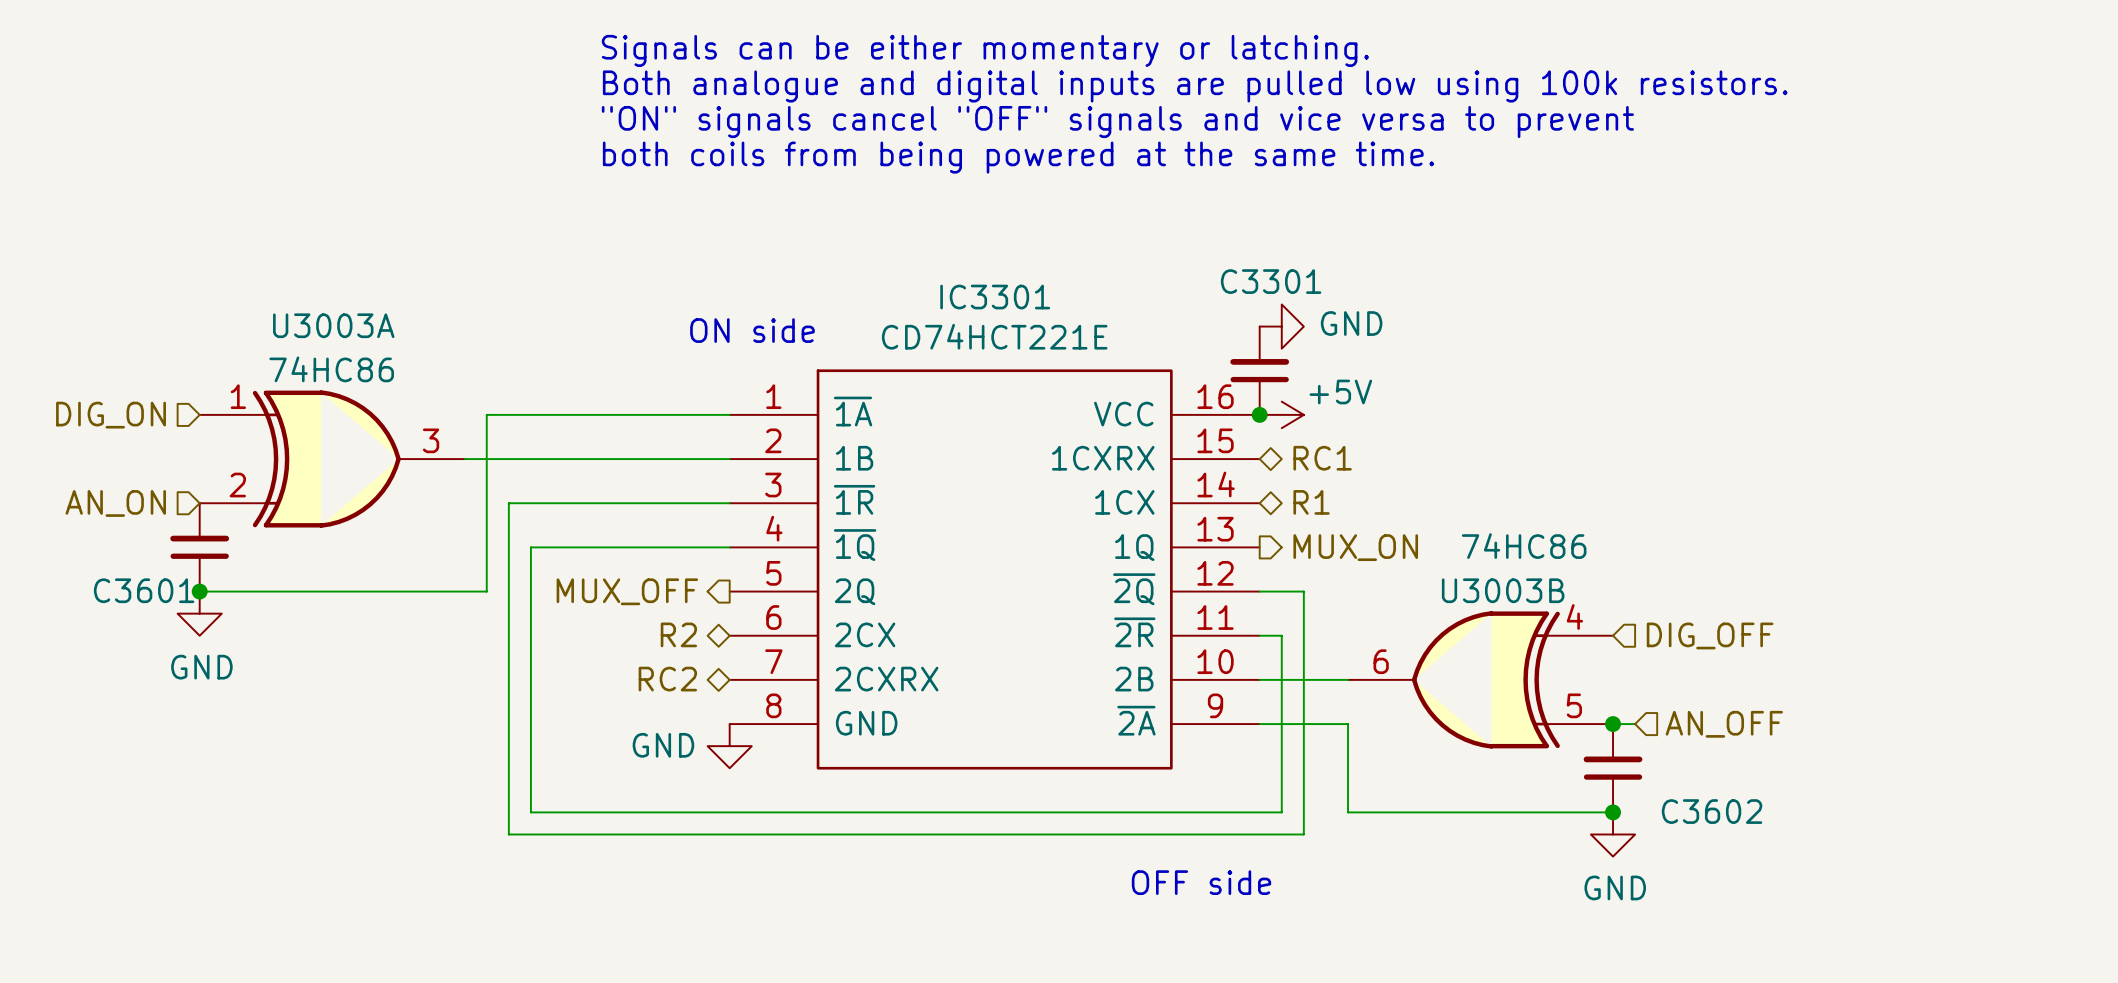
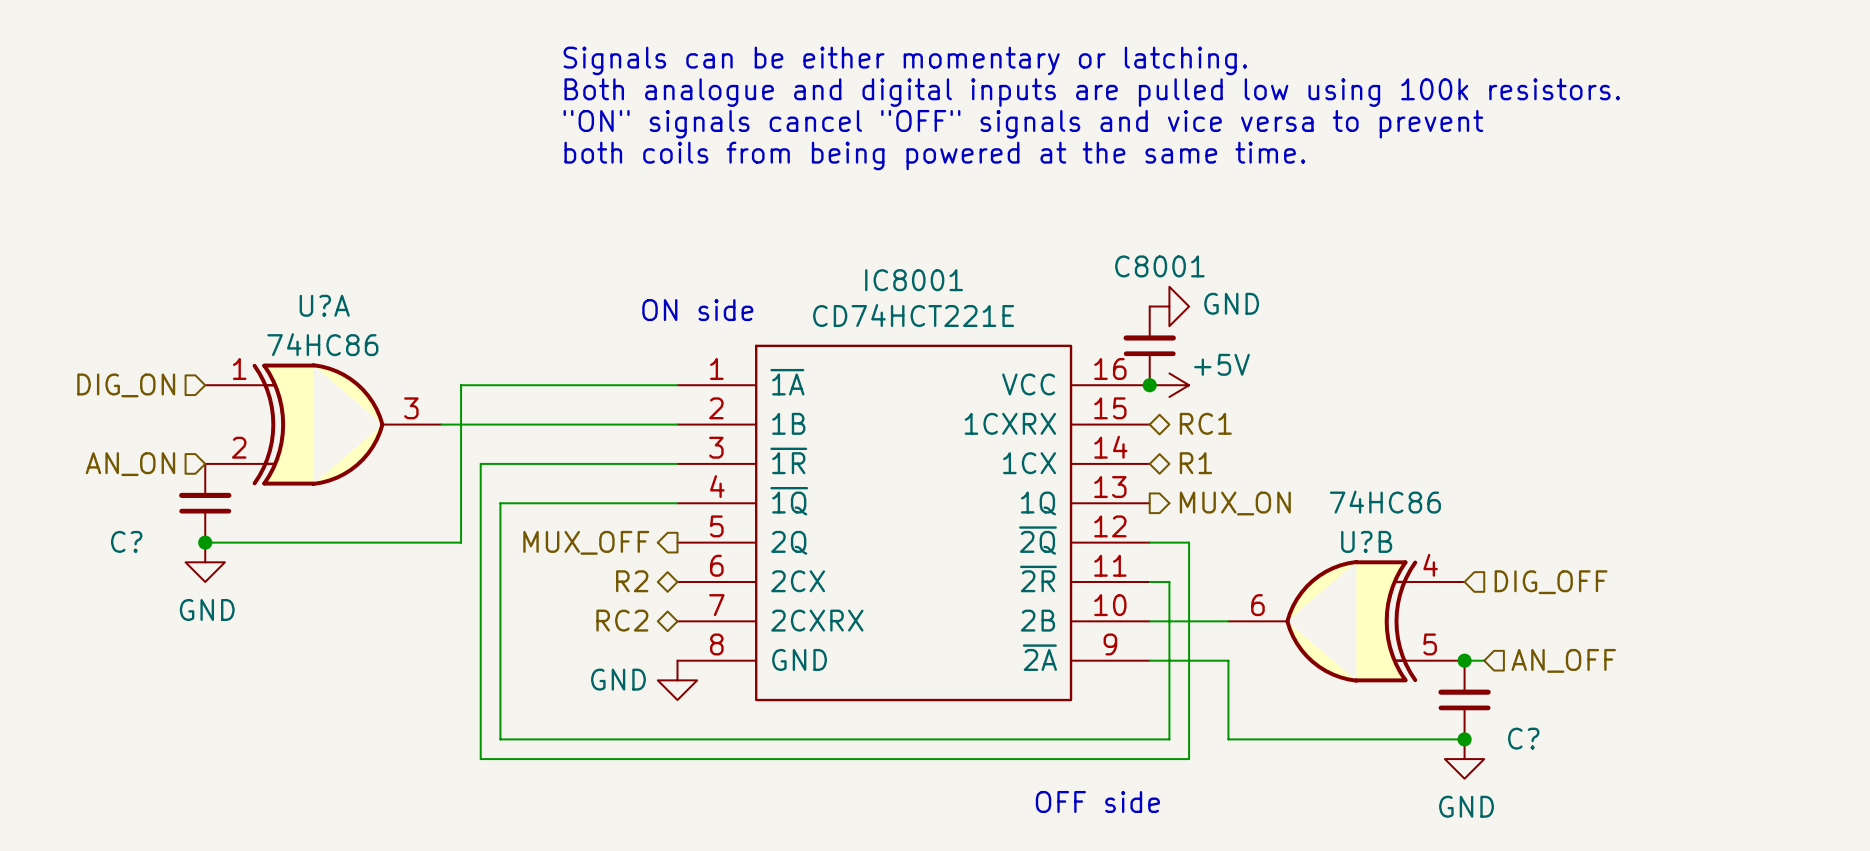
C3301 name: C3301 (1271, 281) -> C8001 (1159, 266)
IC3301 name: IC3301 (995, 297) -> IC8001 (914, 280)
U3003A name: U3003A (333, 325) -> U?A (324, 305)
C3601 name: C3601 (144, 590) -> C? (126, 541)
U3003B name: U3003B (1503, 590) -> U?B (1366, 541)
C3602 name: C3602 (1712, 811) -> C? (1523, 738)

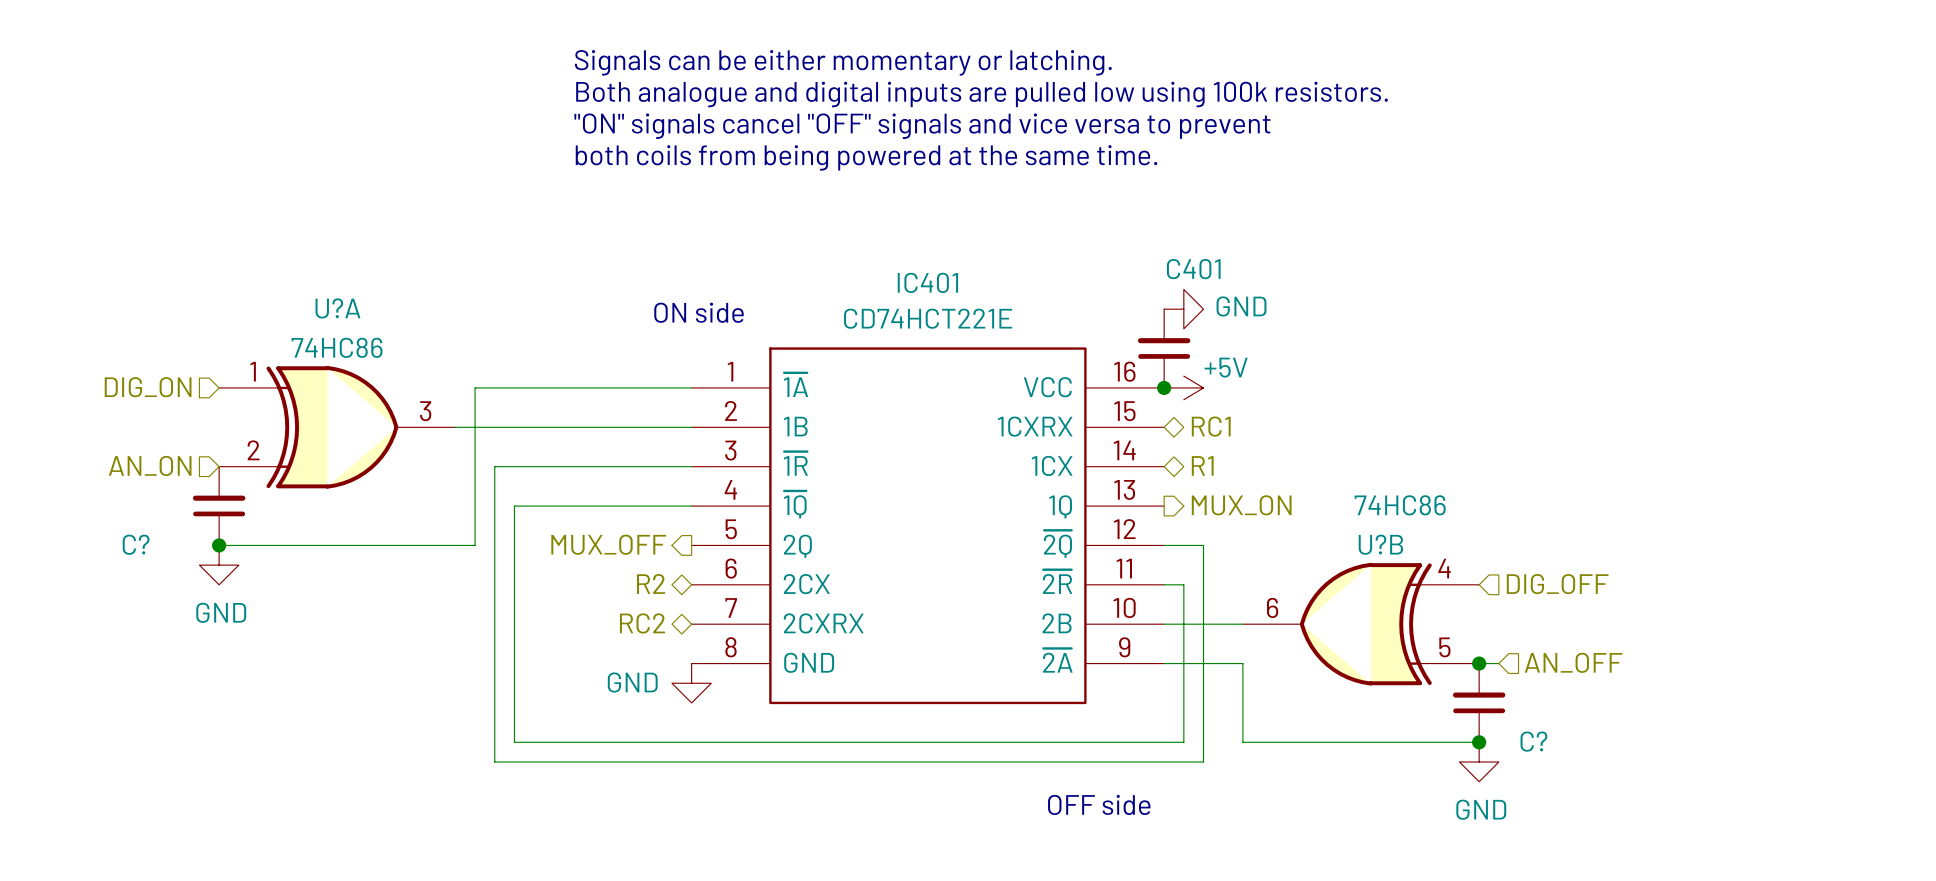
C8001 name: C8001 (1159, 266) -> C401 (1193, 269)
IC8001 name: IC8001 (914, 280) -> IC401 (927, 282)

